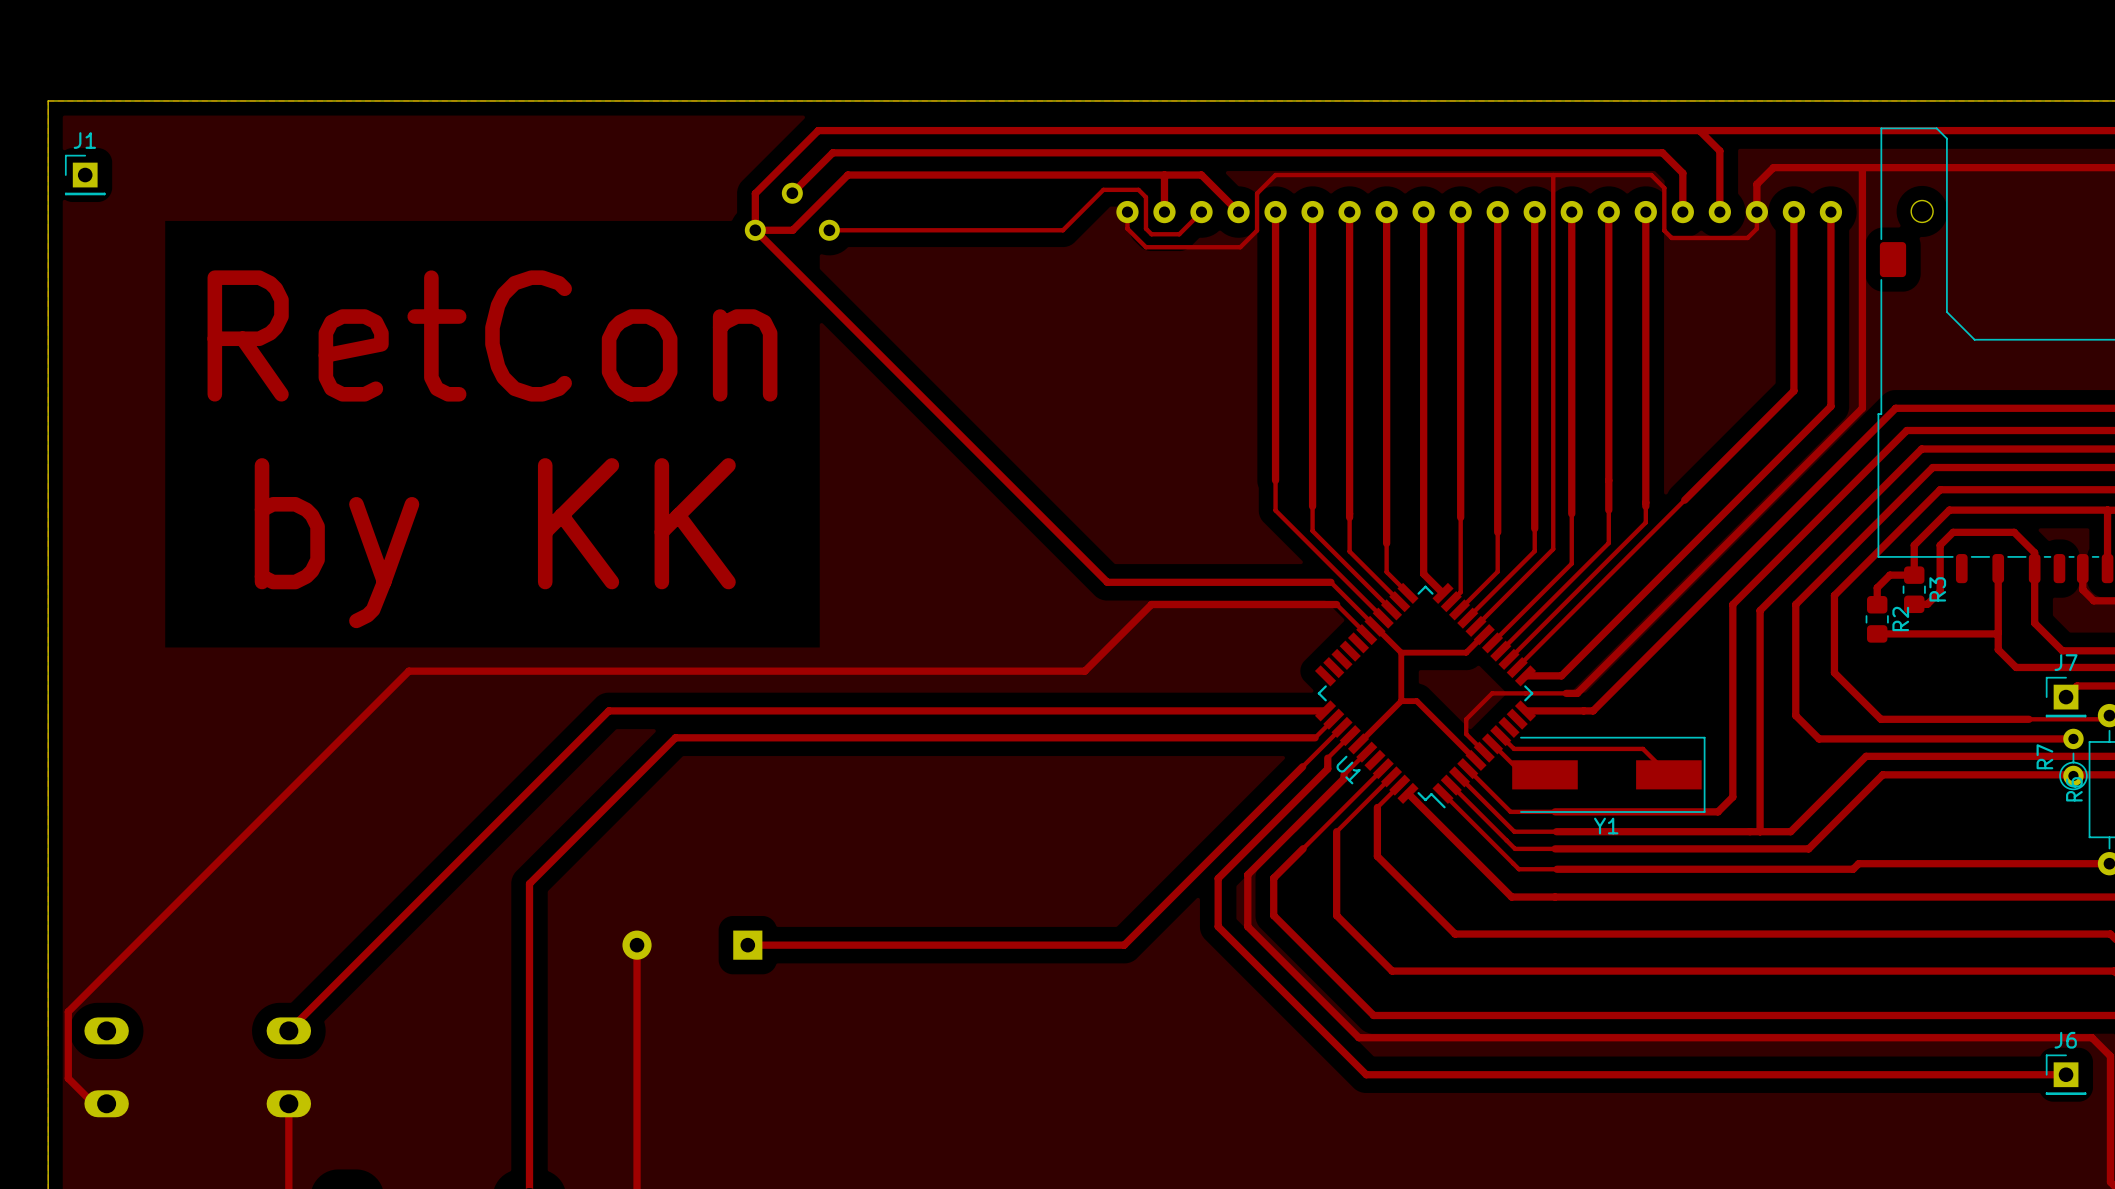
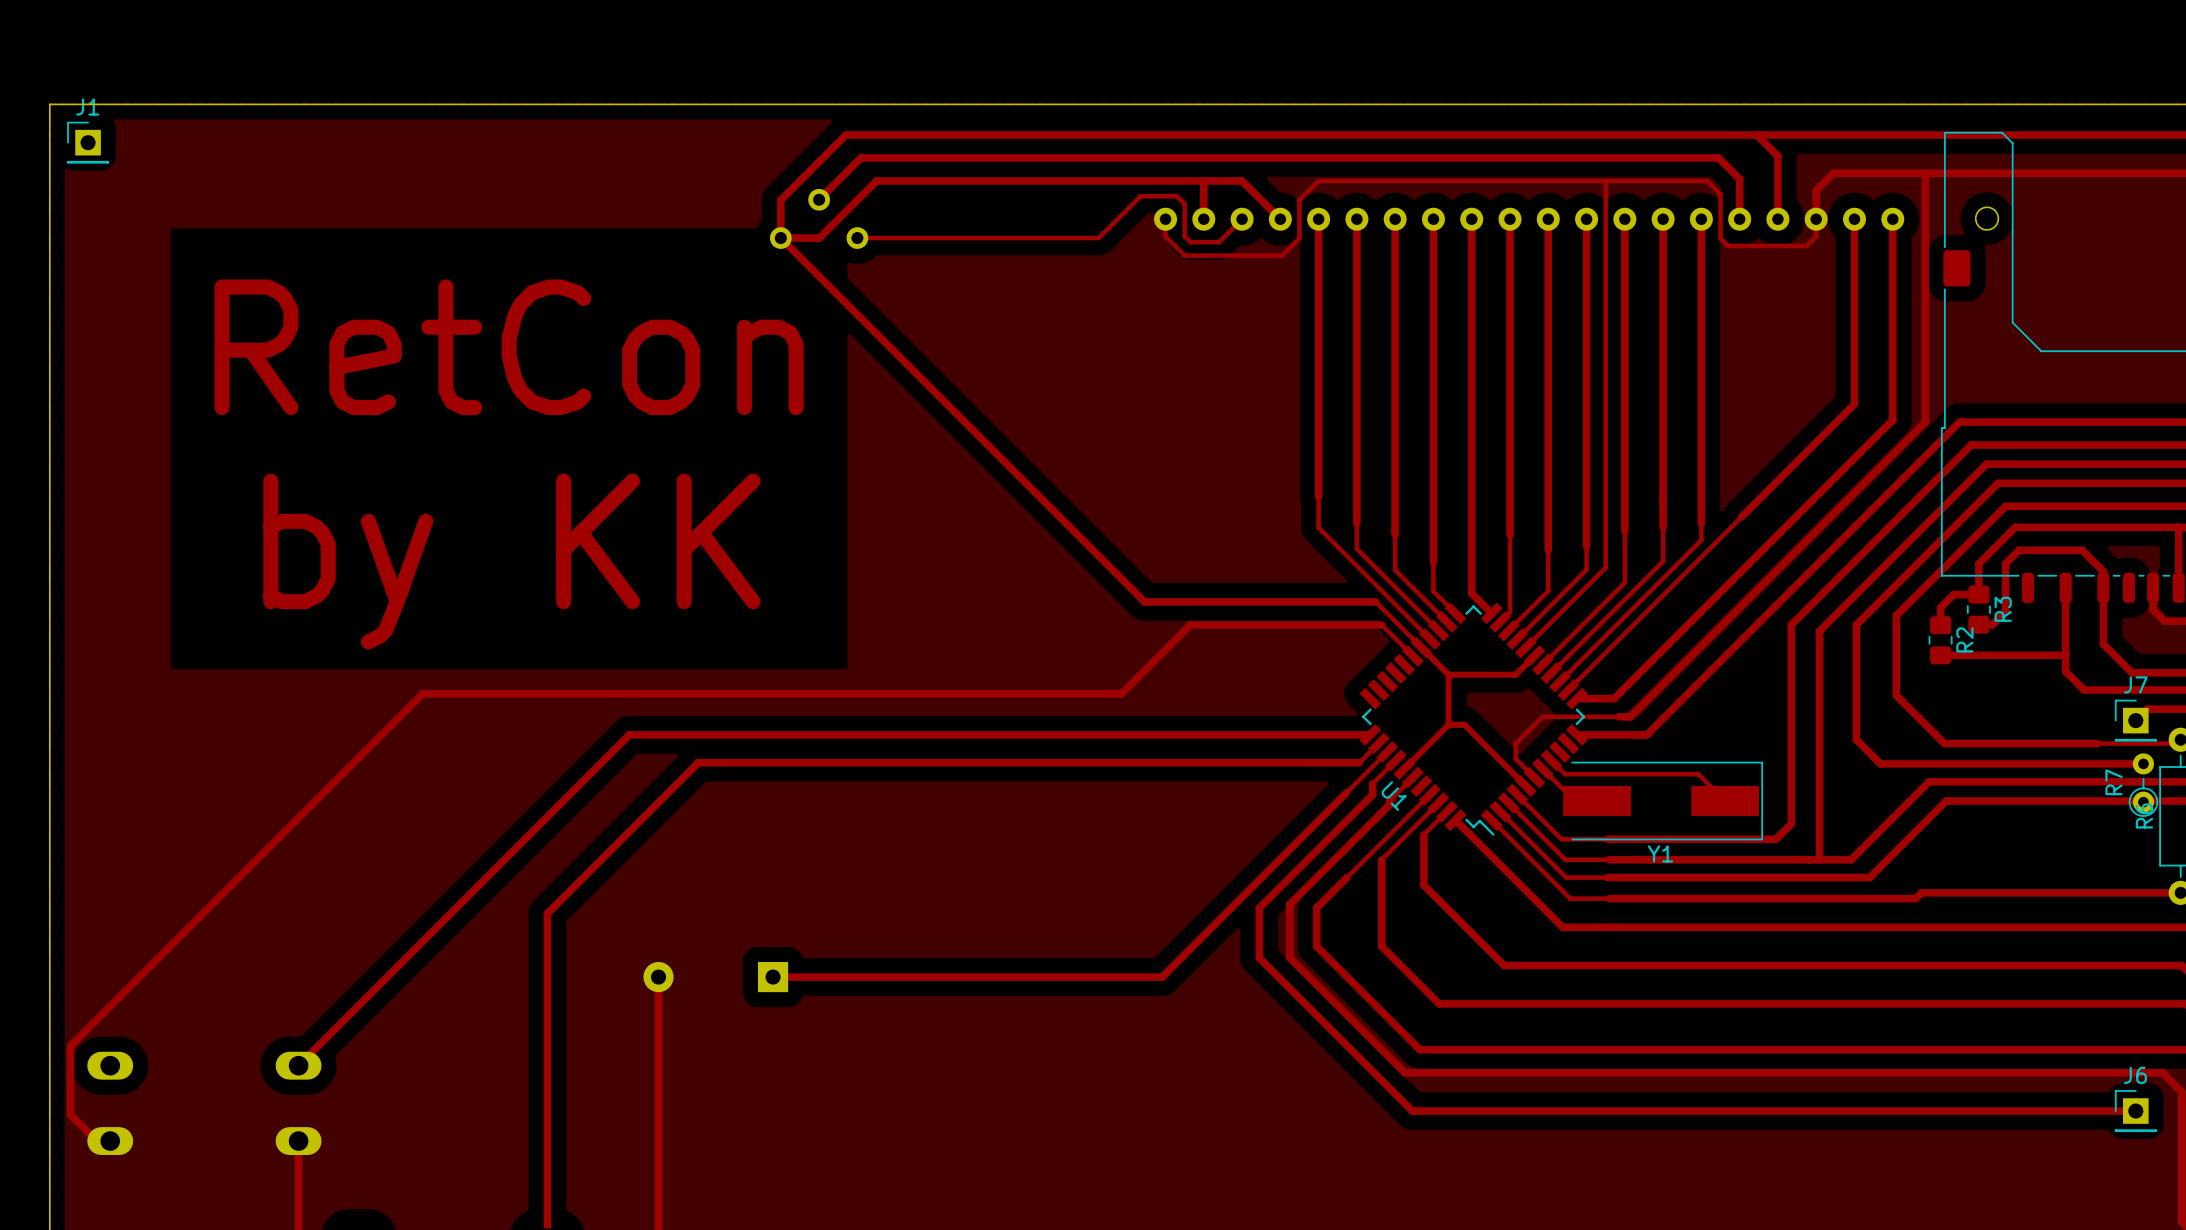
J1 position: (85, 175) -> (88, 142)

